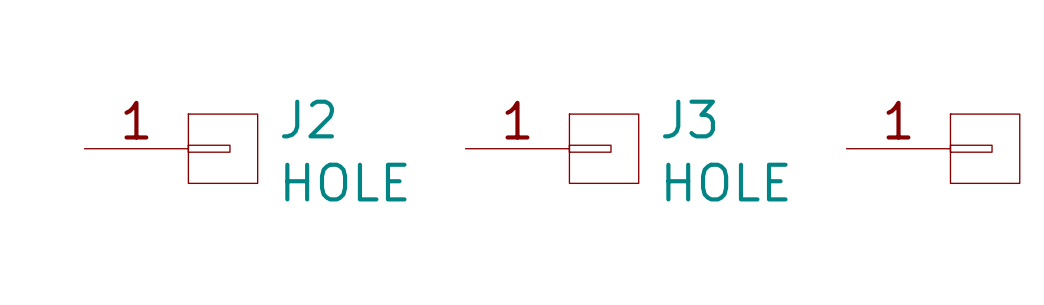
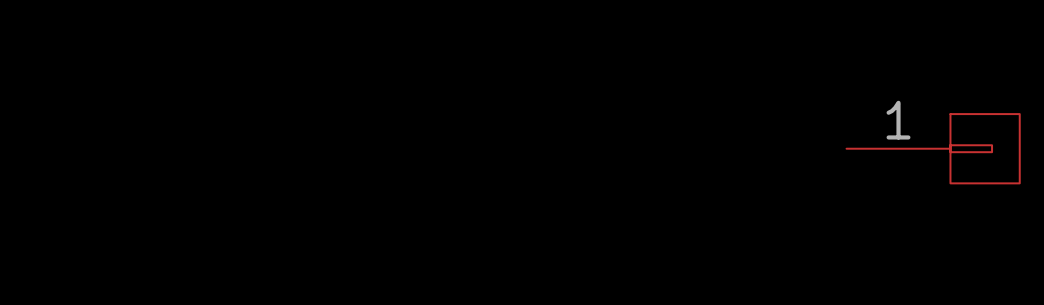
J2: HOLE (171, 148) -> none
J3: HOLE (552, 148) -> none

